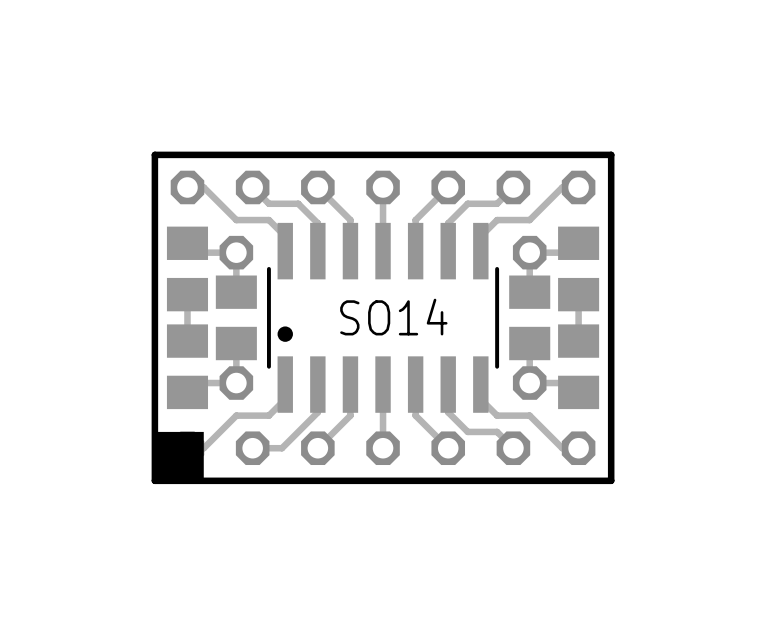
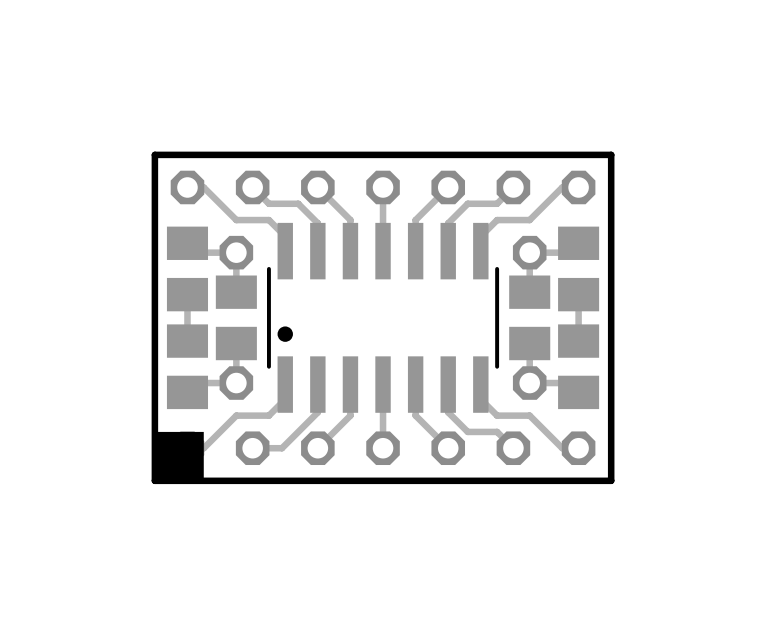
text: SO14 (393, 317) -> none

